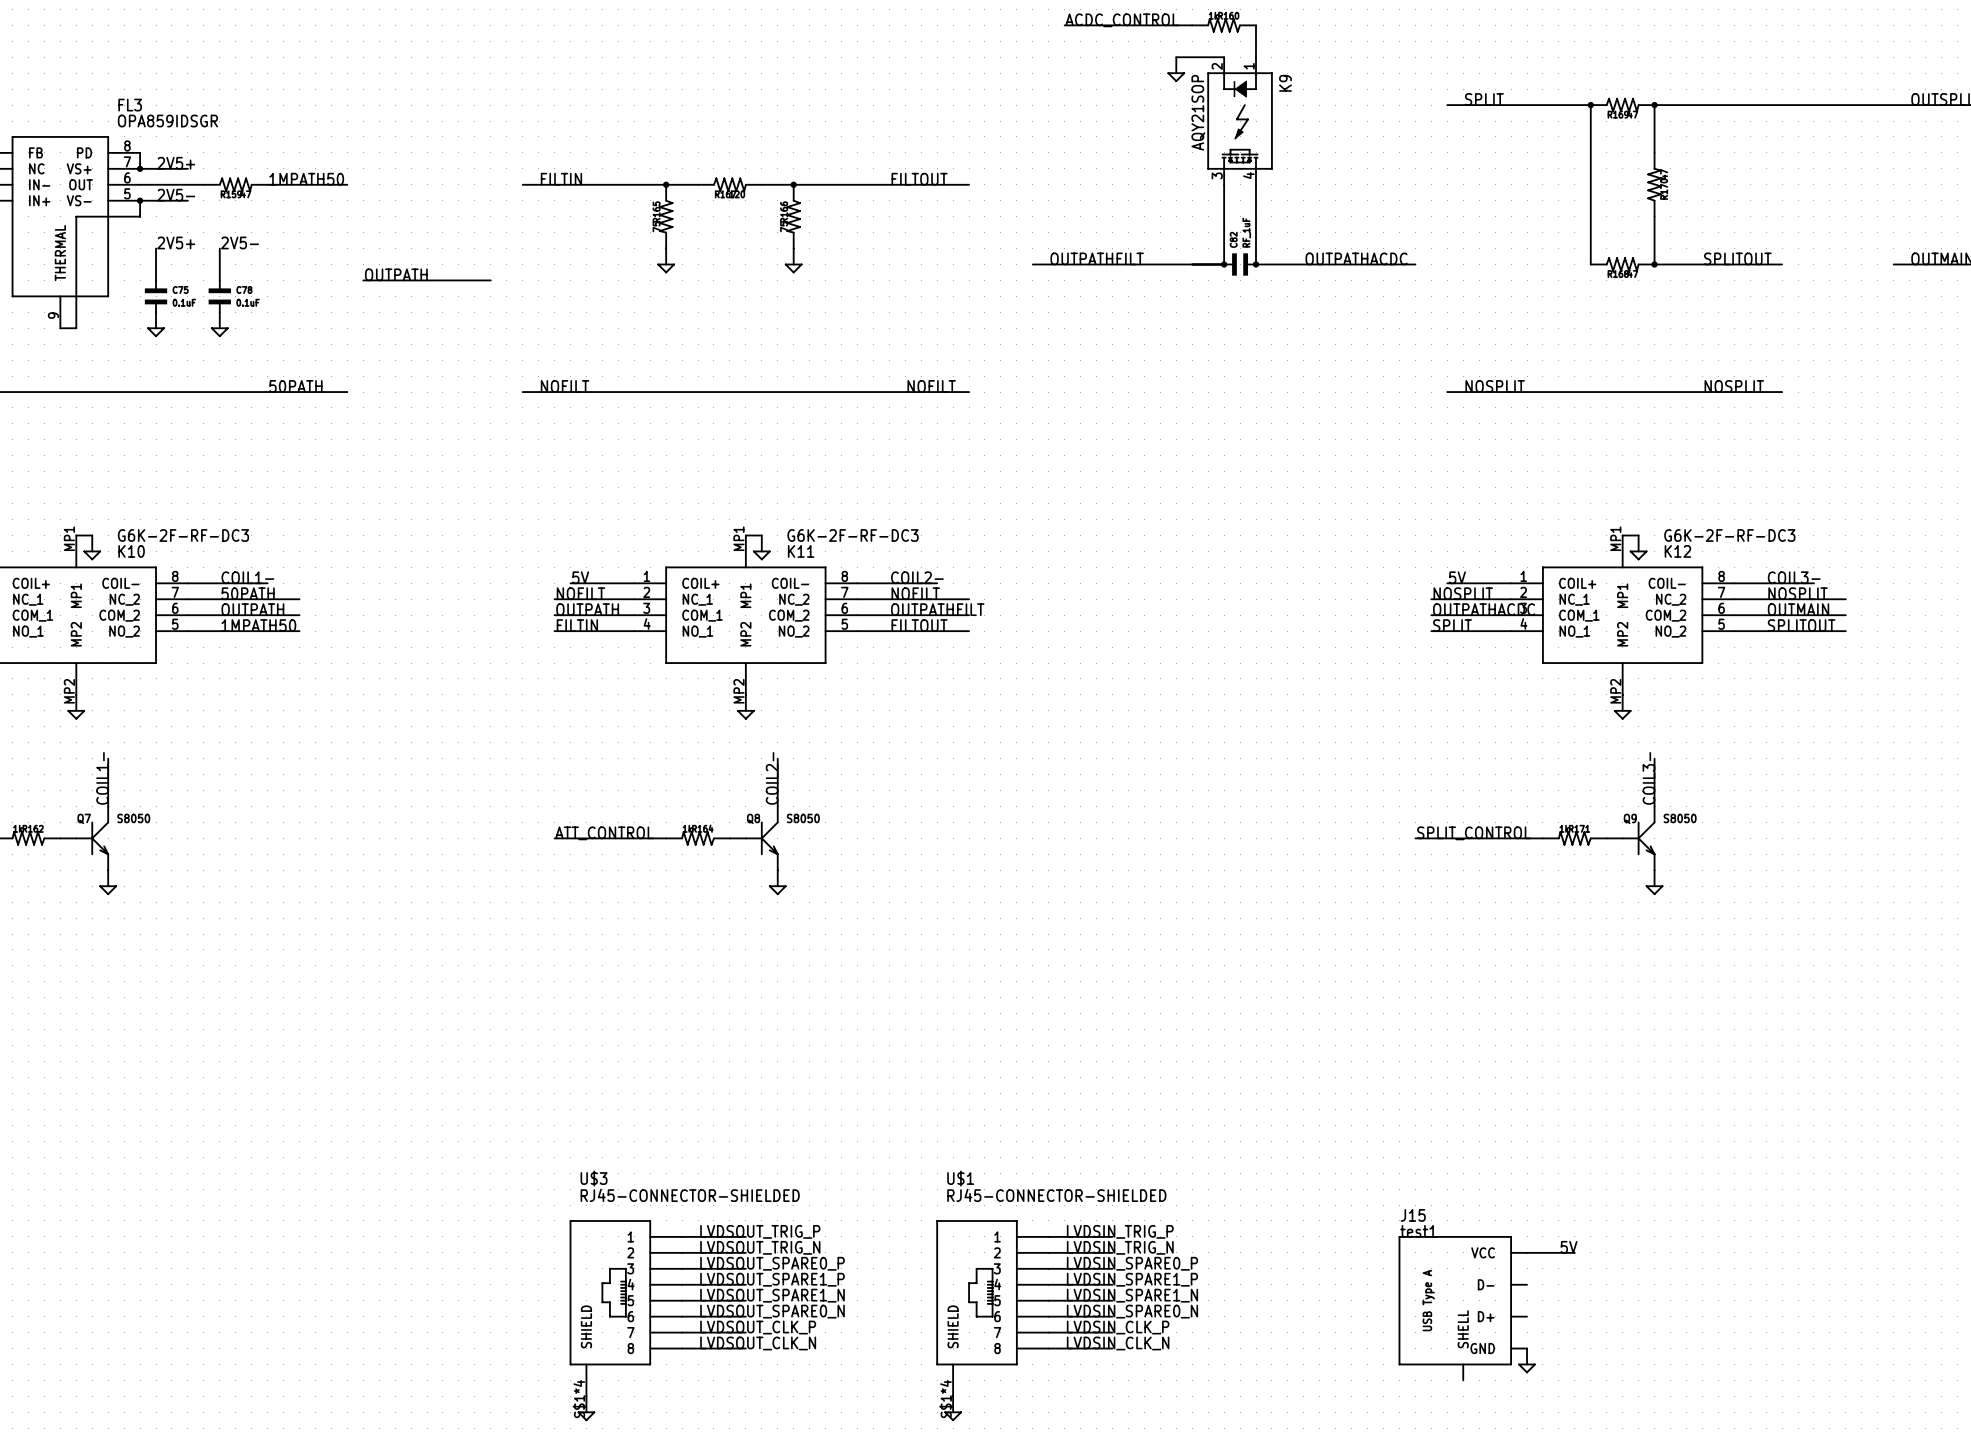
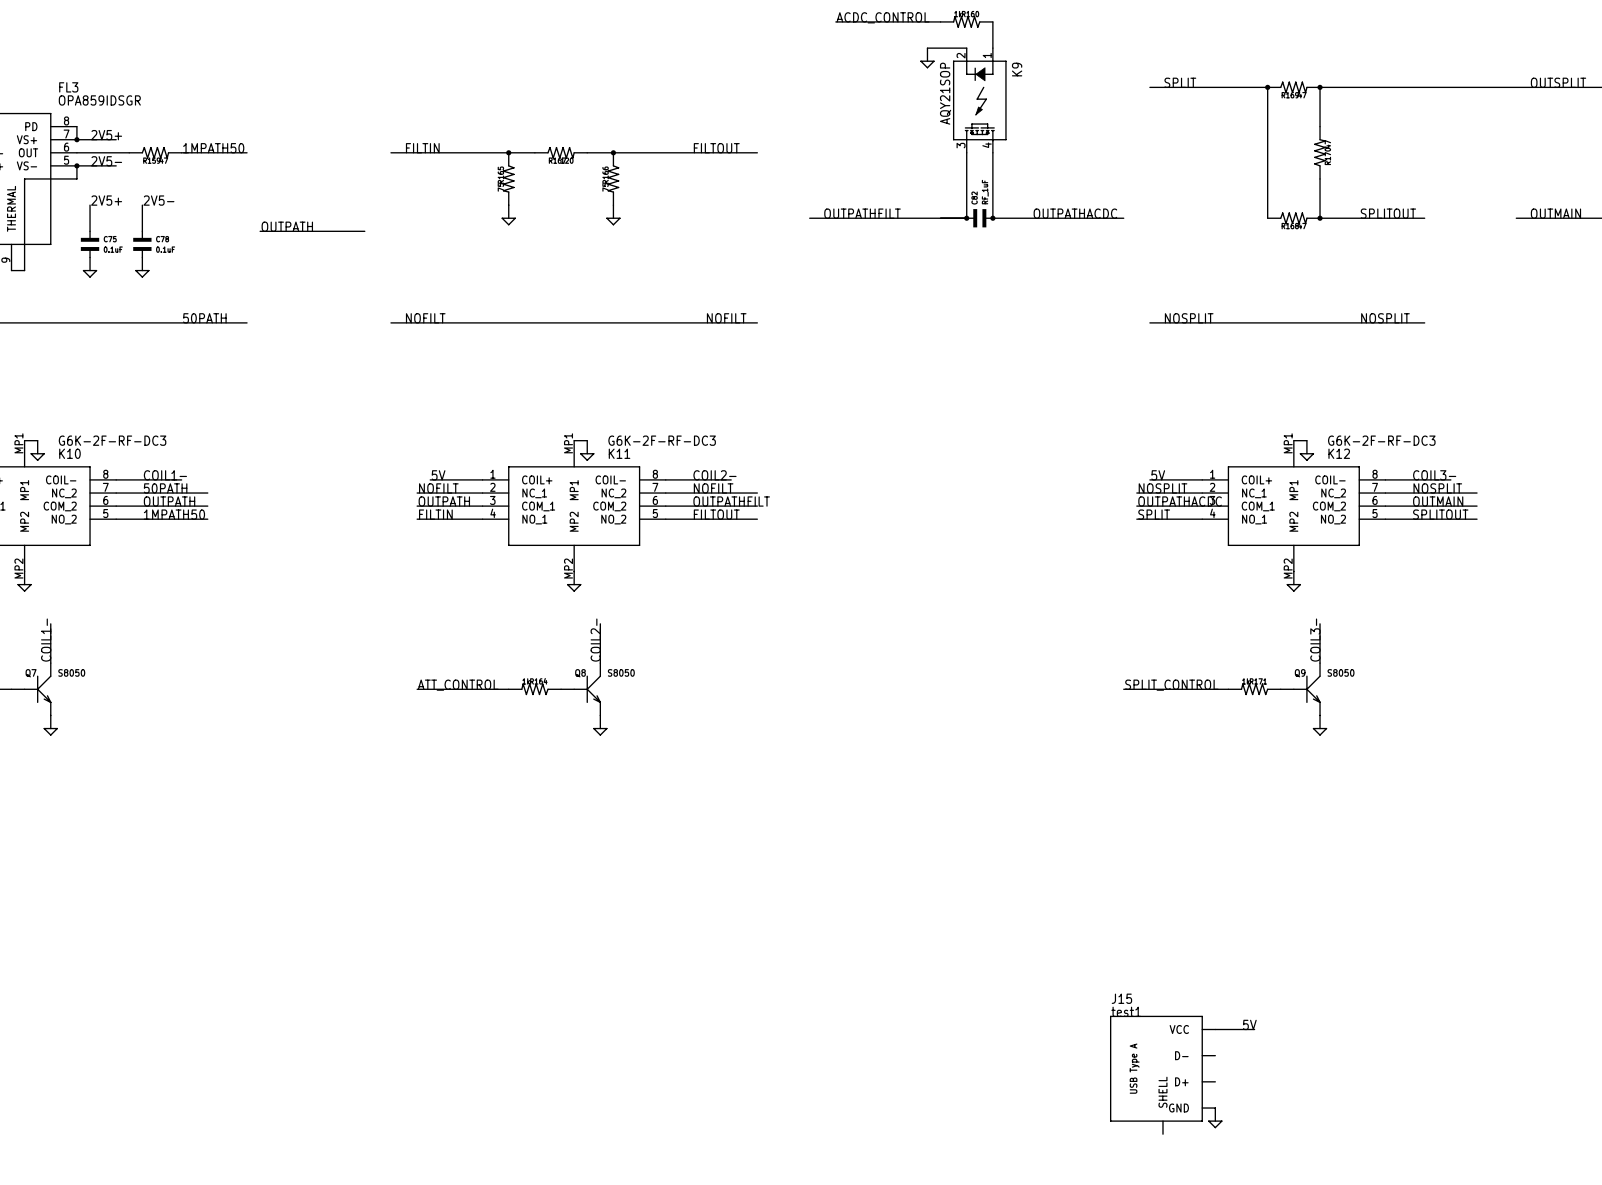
label: LVDSOUT_TRIG_P (760, 1231) -> none
label: LVDSIN_TRIG_P (1120, 1231) -> none
wire: (682, 1236) (745, 1236) -> none
wire: (1048, 1236) (1112, 1236) -> none
label: LVDSOUT_TRIG_N (760, 1247) -> none
label: LVDSIN_TRIG_N (1120, 1247) -> none
wire: (682, 1252) (745, 1252) -> none
wire: (1048, 1252) (1112, 1252) -> none
label: LVDSOUT_SPARE0_P (772, 1263) -> none
label: LVDSIN_SPARE0_P (1132, 1263) -> none
wire: (682, 1268) (745, 1268) -> none
wire: (1048, 1268) (1112, 1268) -> none
label: LVDSOUT_SPARE1_P (772, 1279) -> none
label: LVDSIN_SPARE1_P (1132, 1279) -> none
wire: (682, 1284) (745, 1284) -> none
wire: (1048, 1284) (1112, 1284) -> none
label: LVDSOUT_SPARE1_N (772, 1295) -> none
label: LVDSIN_SPARE1_N (1132, 1295) -> none
wire: (682, 1300) (745, 1300) -> none
wire: (1048, 1300) (1112, 1300) -> none
U$3: RJ45-CONNECTOR-SHIELDED (626, 1308) -> none
U$1: RJ45-CONNECTOR-SHIELDED (992, 1308) -> none
label: LVDSOUT_SPARE0_N (772, 1311) -> none
label: LVDSIN_SPARE0_N (1132, 1311) -> none
wire: (682, 1316) (745, 1316) -> none
wire: (1048, 1316) (1112, 1316) -> none
label: LVDSOUT_CLK_P (758, 1327) -> none
label: LVDSIN_CLK_P (1118, 1327) -> none
wire: (682, 1332) (745, 1332) -> none
wire: (1048, 1332) (1112, 1332) -> none
label: LVDSOUT_CLK_N (758, 1343) -> none
label: LVDSIN_CLK_N (1118, 1343) -> none
wire: (682, 1348) (745, 1348) -> none
wire: (1048, 1348) (1112, 1348) -> none
power symbol: (586, 1408) -> none
power symbol: (953, 1408) -> none

